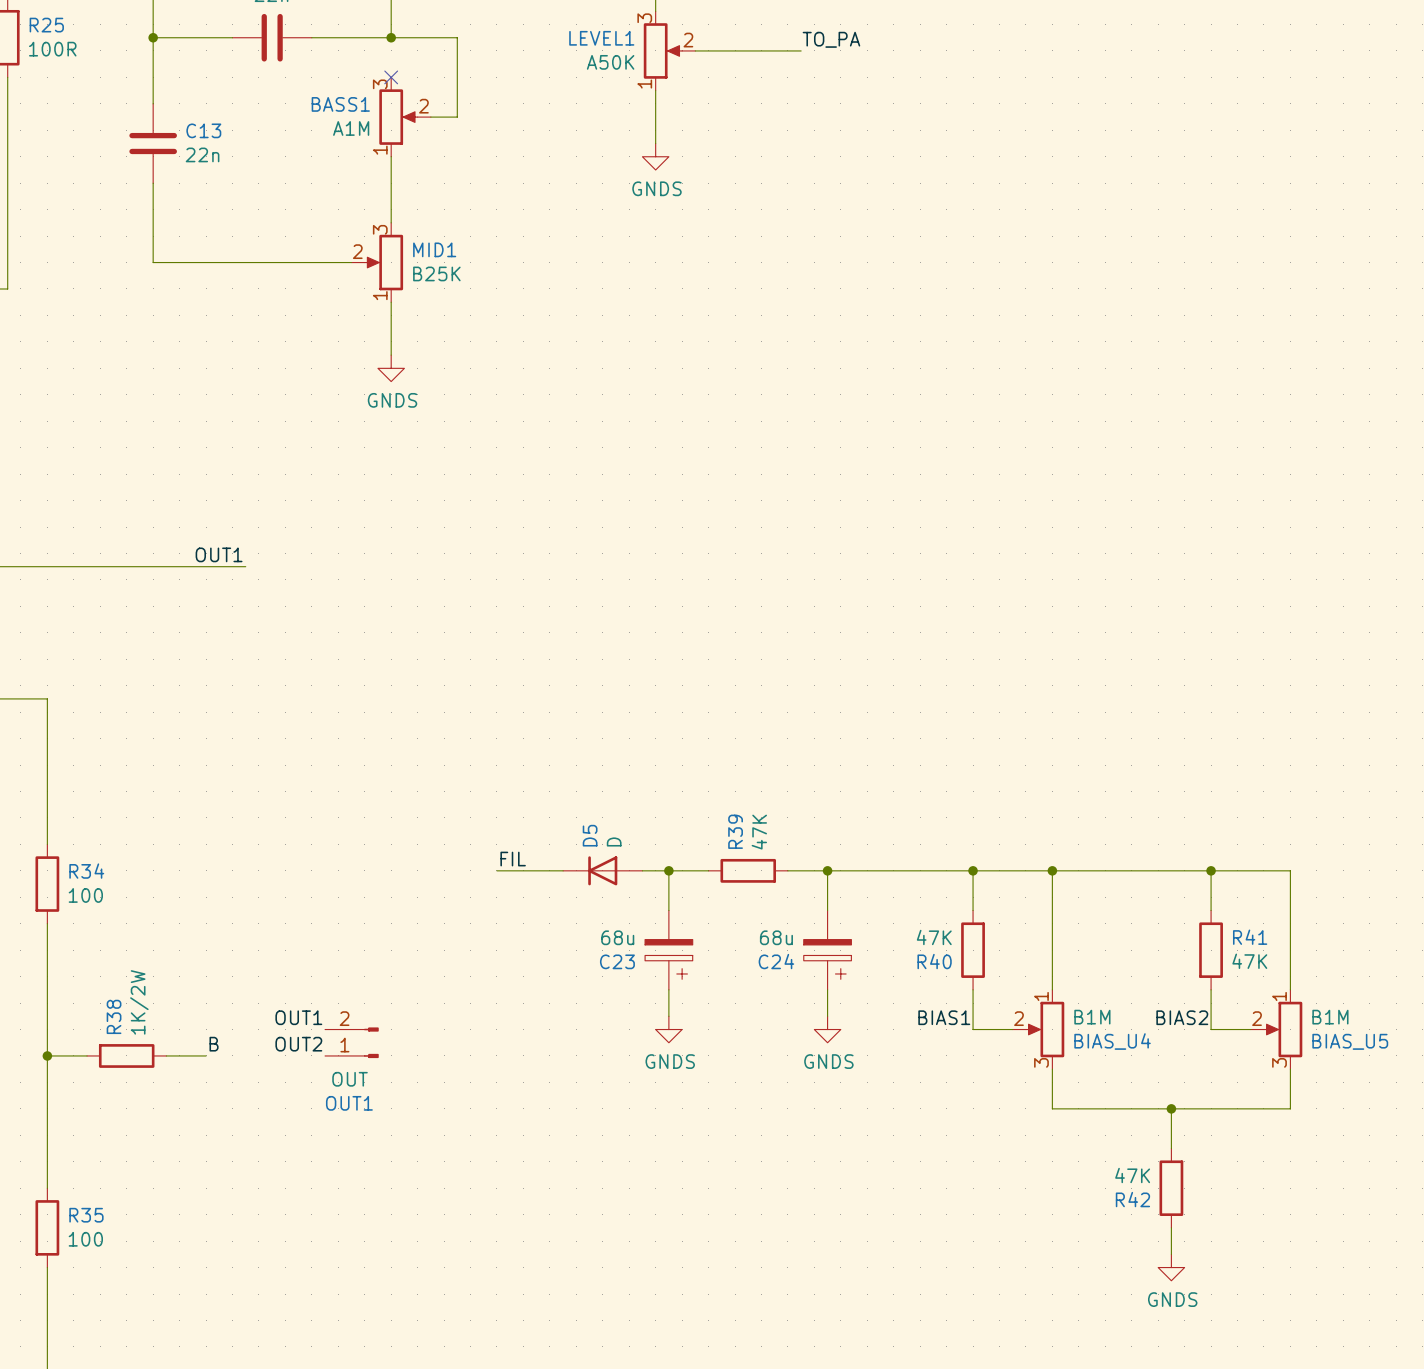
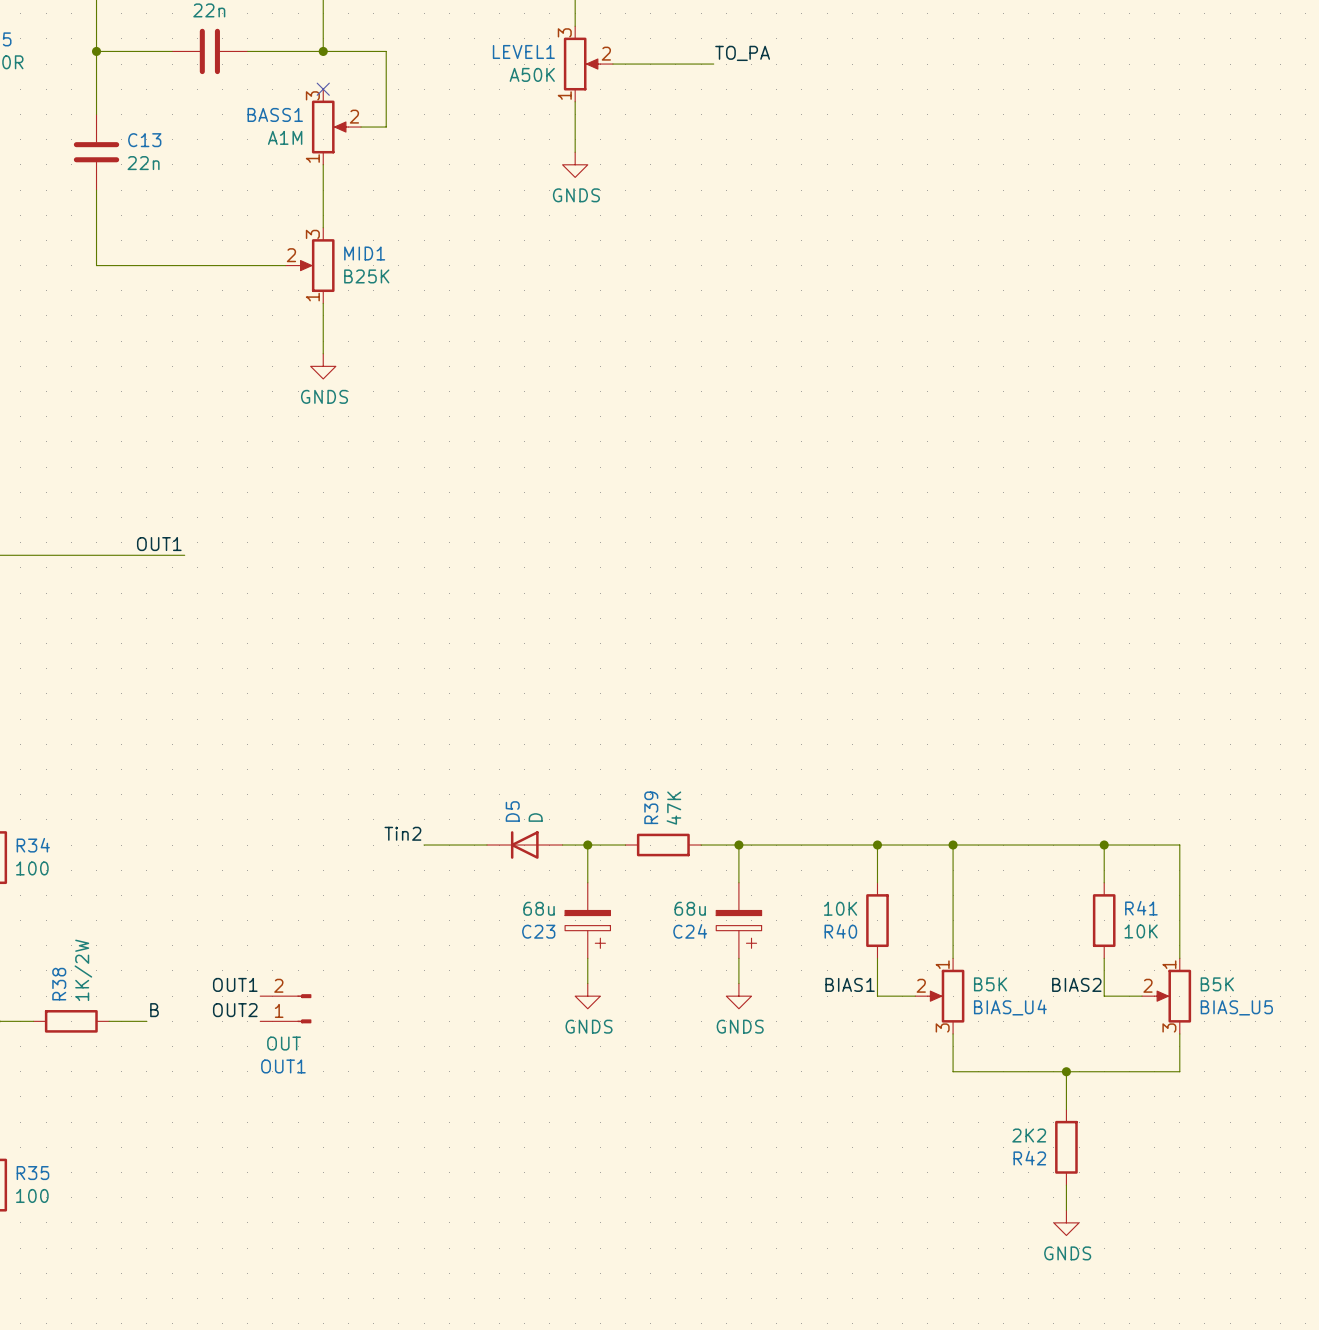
label: FIL (513, 859) -> Tin2 (402, 833)
R40 value: 47K (934, 937) -> 10K (840, 908)
R41 value: 47K (1249, 961) -> 10K (1141, 931)
BIAS_U4 value: B1M (1092, 1017) -> B5K (990, 984)
BIAS_U5 value: B1M (1330, 1017) -> B5K (1217, 984)
R42 value: 47K (1132, 1175) -> 2K2 (1029, 1135)

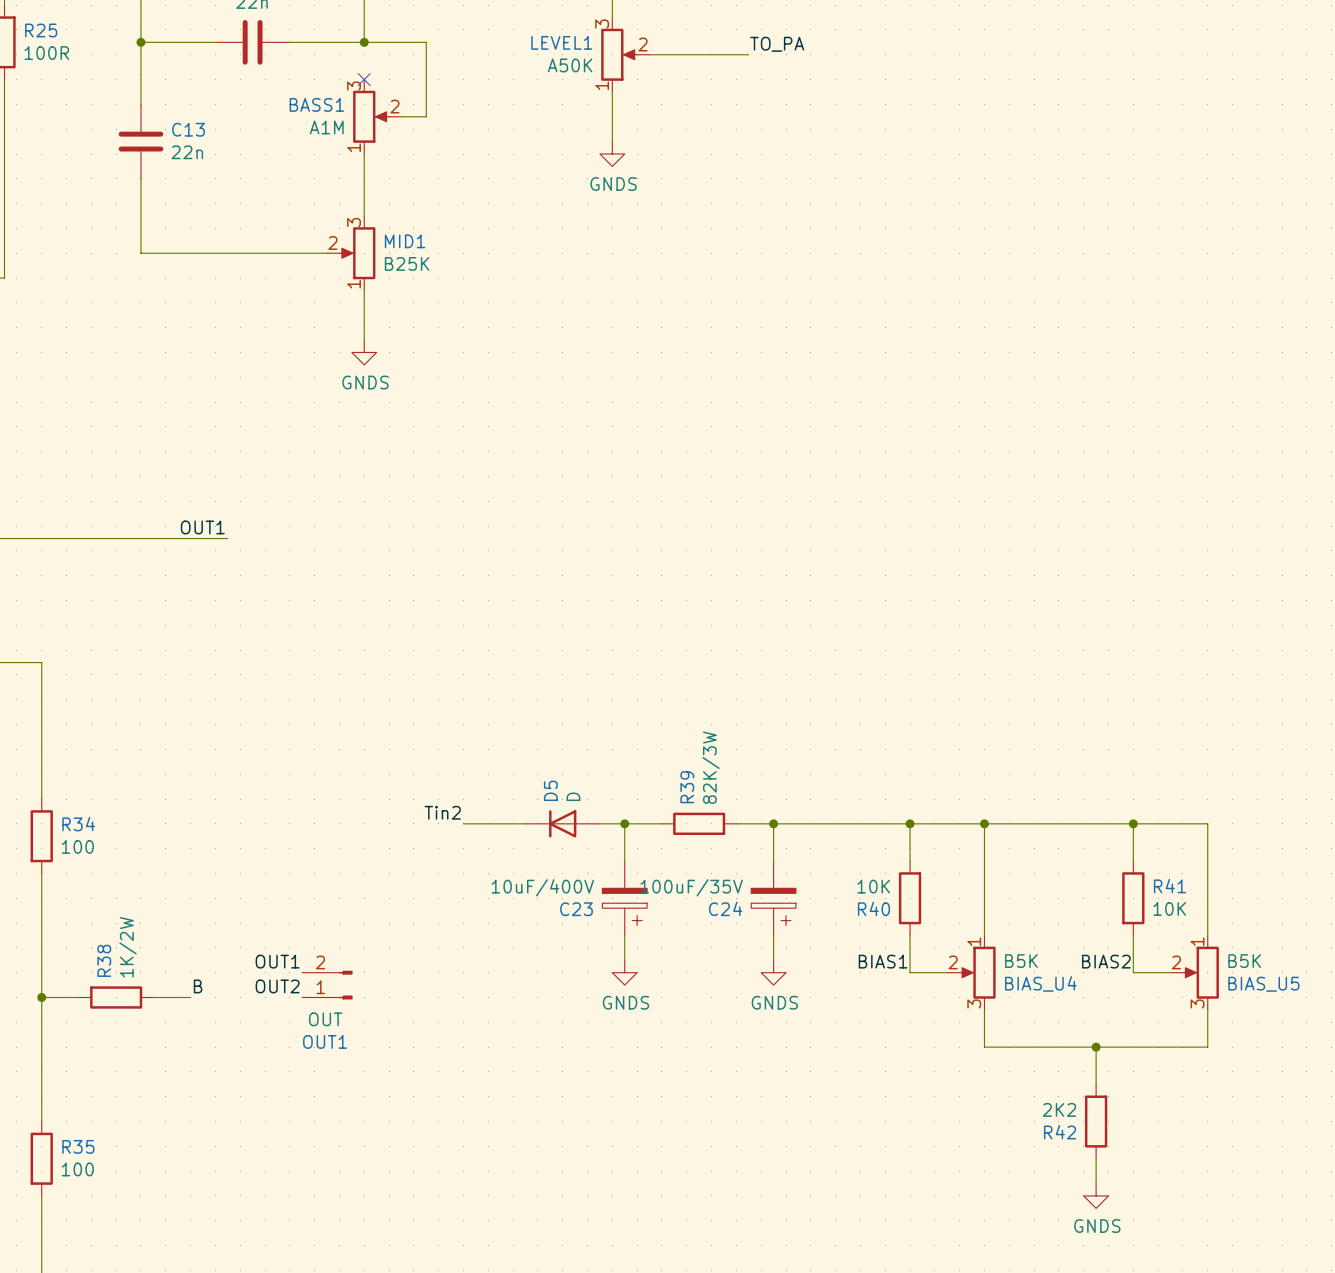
R39 value: 47K (673, 808) -> 82K/3W (711, 767)
C23 value: 68u (539, 908) -> 10uF/400V (542, 887)
C24 value: 68u (690, 908) -> 100uF/35V (691, 887)

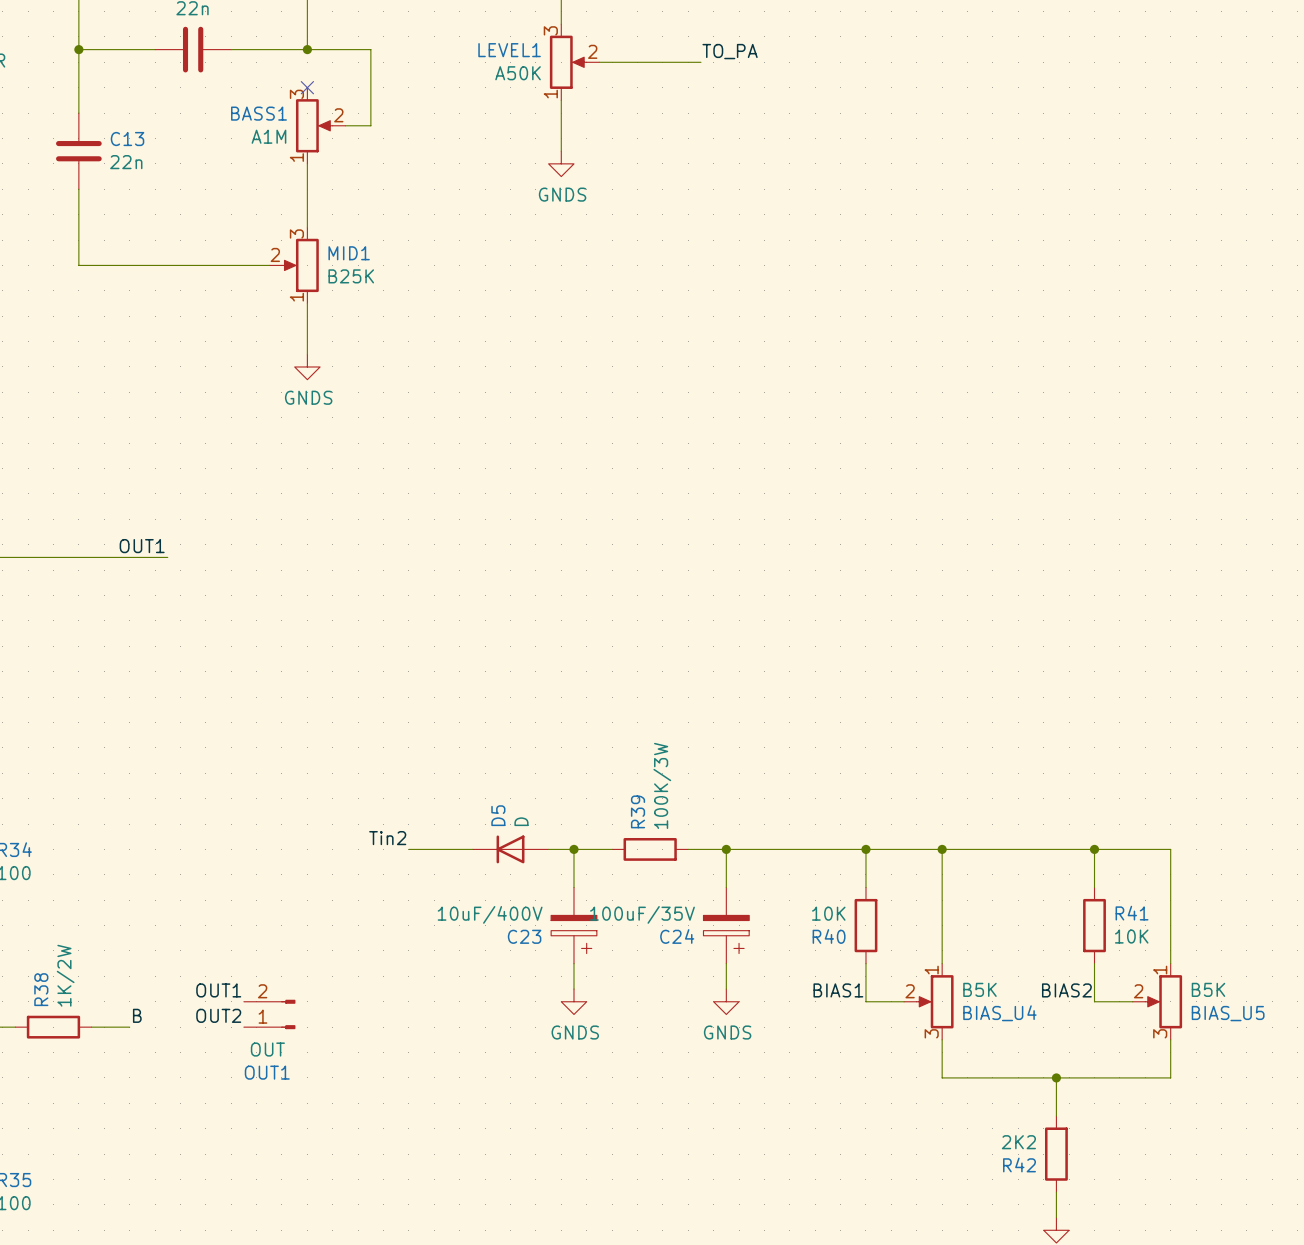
R39 value: 82K/3W (711, 767) -> 100K/3W (662, 785)

